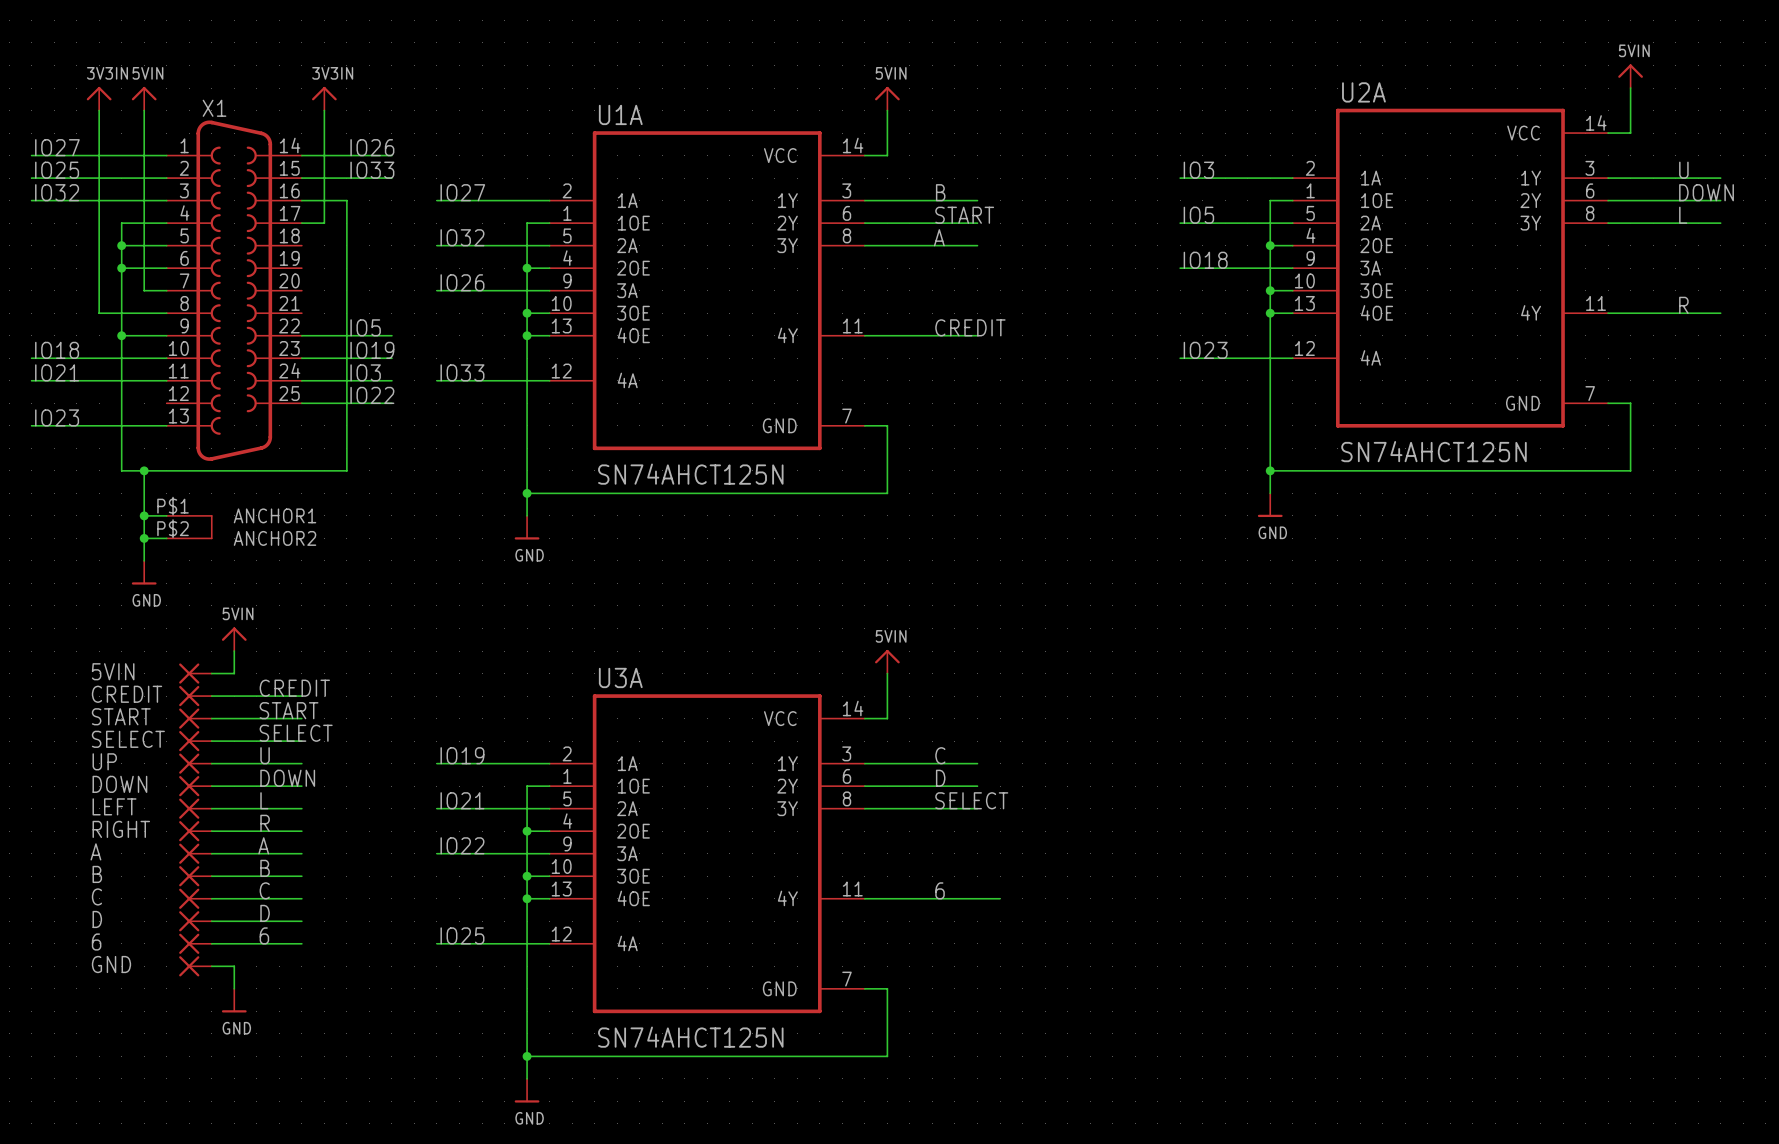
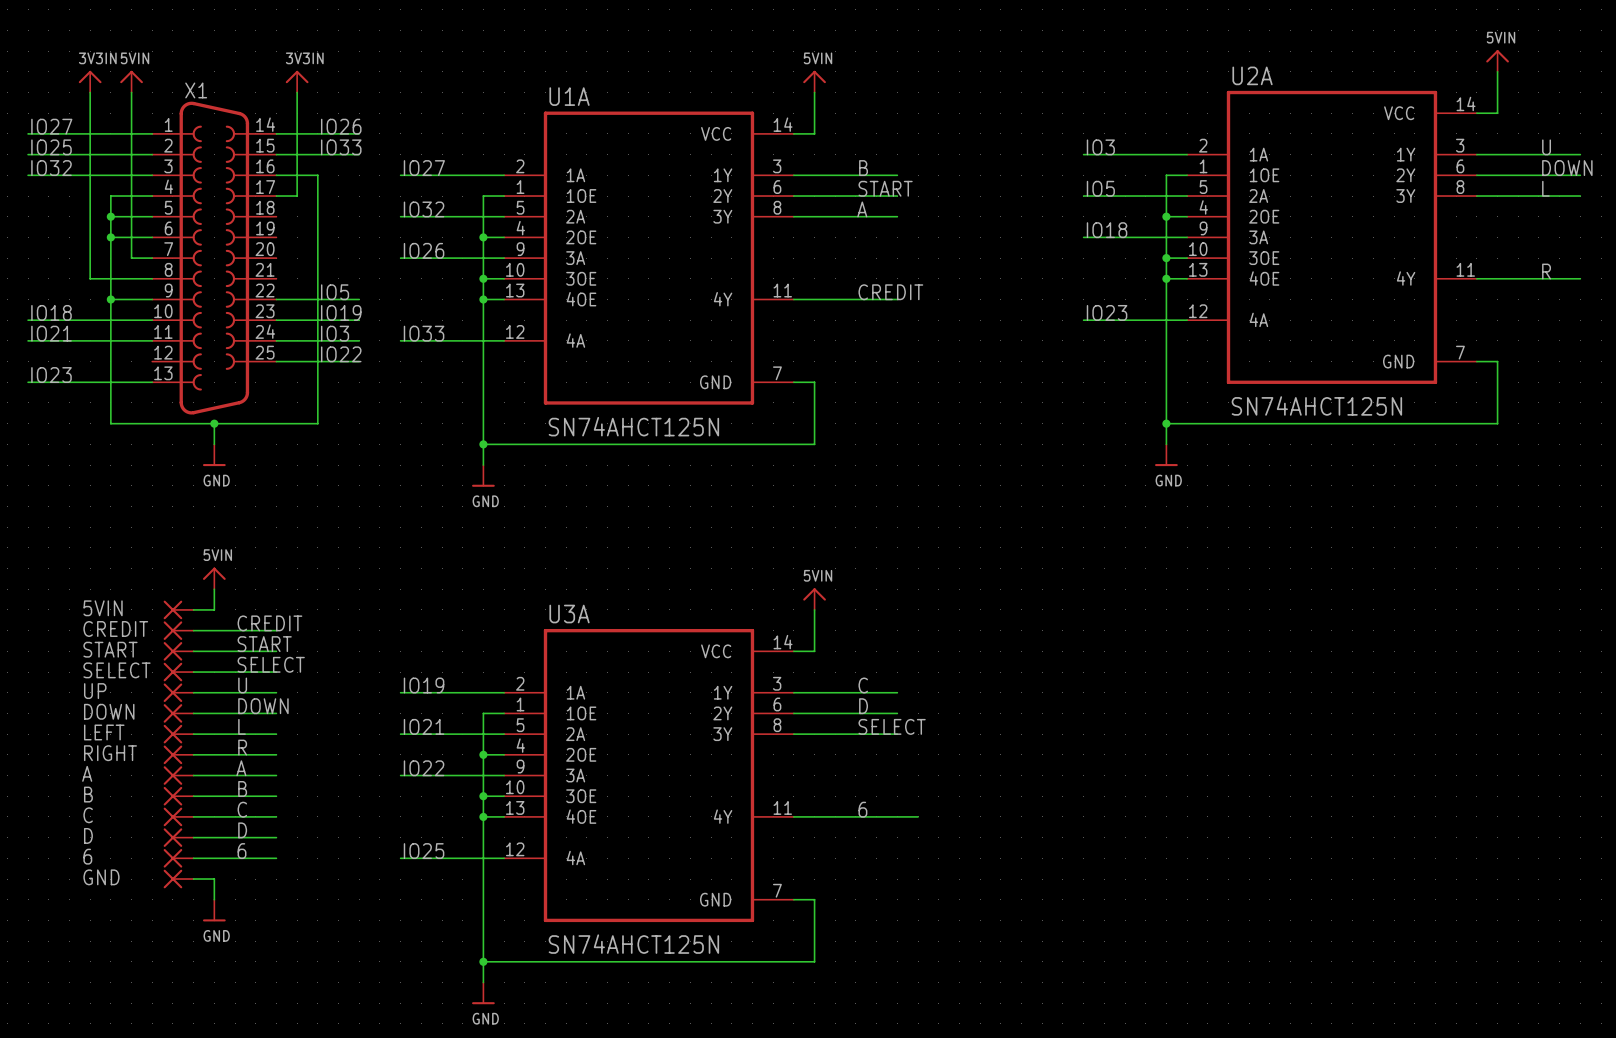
X1 symbol: [166, 120, 302, 540] -> [152, 101, 277, 415]
wire: (144, 470) (144, 560) -> none
junction: (144, 470) -> none
wire: none -> (214, 423) (214, 444)
junction: none -> (214, 423)
wire: (144, 515) (166, 515) -> none
junction: (144, 515) -> none
wire: (144, 538) (166, 538) -> none
junction: (144, 538) -> none
power symbol position: GND (144, 572) -> GND (214, 455)

